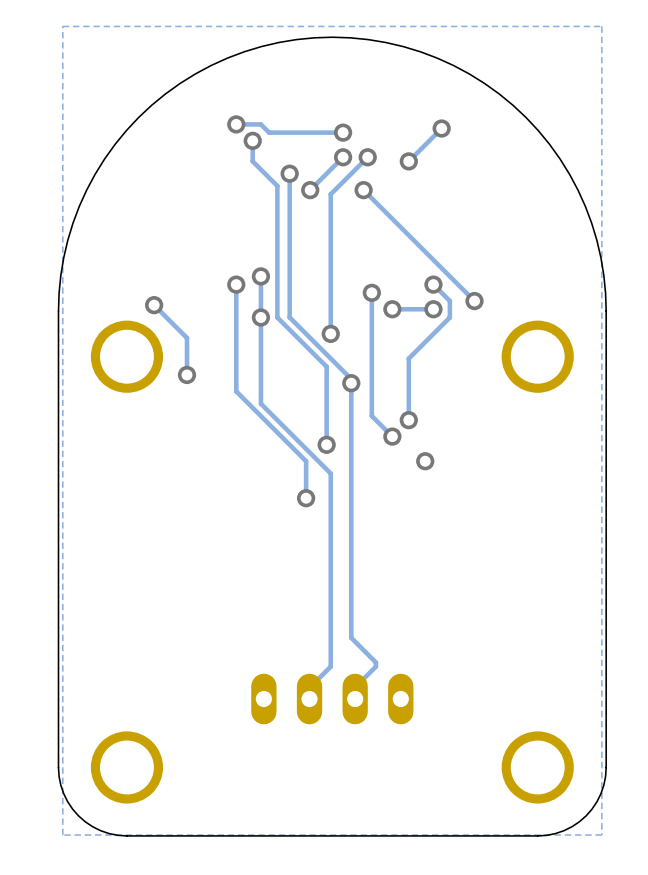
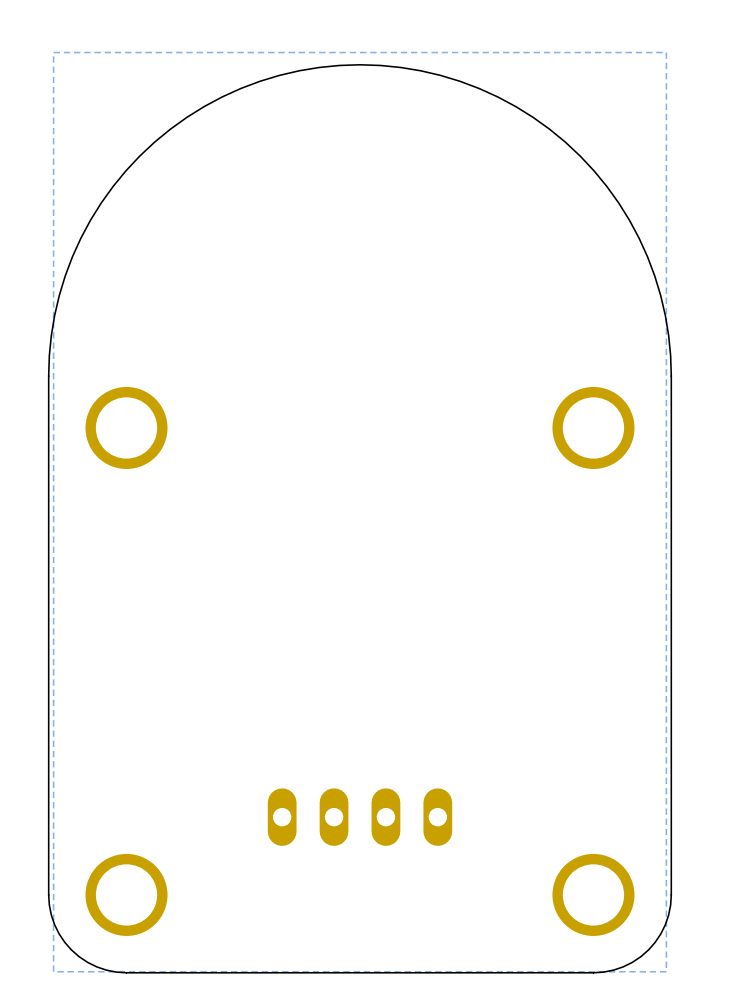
track: (236, 124) (260, 124) (269, 132) (343, 132) -> none
via: (236, 124) -> none
track: (441, 128) (408, 161) -> none
via: (441, 128) -> none
via: (343, 132) -> none
track: (252, 140) (252, 161) (277, 186) (277, 317) (326, 366) (326, 444) -> none
via: (252, 140) -> none
track: (343, 157) (310, 190) -> none
via: (343, 157) -> none
track: (367, 157) (330, 194) (330, 333) -> none
via: (367, 157) -> none
via: (408, 161) -> none
track: (289, 173) (289, 317) (351, 379) (351, 637) (375, 662) (375, 666) (355, 687) (355, 699) -> none
via: (289, 173) -> none
via: (310, 190) -> none
track: (363, 190) (474, 301) -> none
via: (363, 190) -> none
track: (260, 276) (260, 403) (330, 473) (330, 666) (310, 687) (309, 699) -> none
via: (260, 276) -> none
track: (236, 284) (236, 391) (306, 461) (306, 498) -> none
via: (236, 284) -> none
track: (433, 284) (449, 301) (449, 317) (408, 358) (408, 420) -> none
via: (433, 284) -> none
track: (371, 292) (371, 416) (392, 436) -> none
via: (371, 292) -> none
via: (474, 301) -> none
track: (154, 305) (186, 338) (186, 374) -> none
via: (154, 305) -> none
via: (392, 309) -> none
track: (433, 309) (392, 309) -> none
via: (433, 309) -> none
via: (260, 317) -> none
via: (330, 333) -> none
via: (186, 374) -> none
via: (351, 383) -> none
via: (408, 420) -> none
via: (392, 436) -> none
via: (326, 444) -> none
via: (425, 461) -> none
via: (306, 498) -> none

